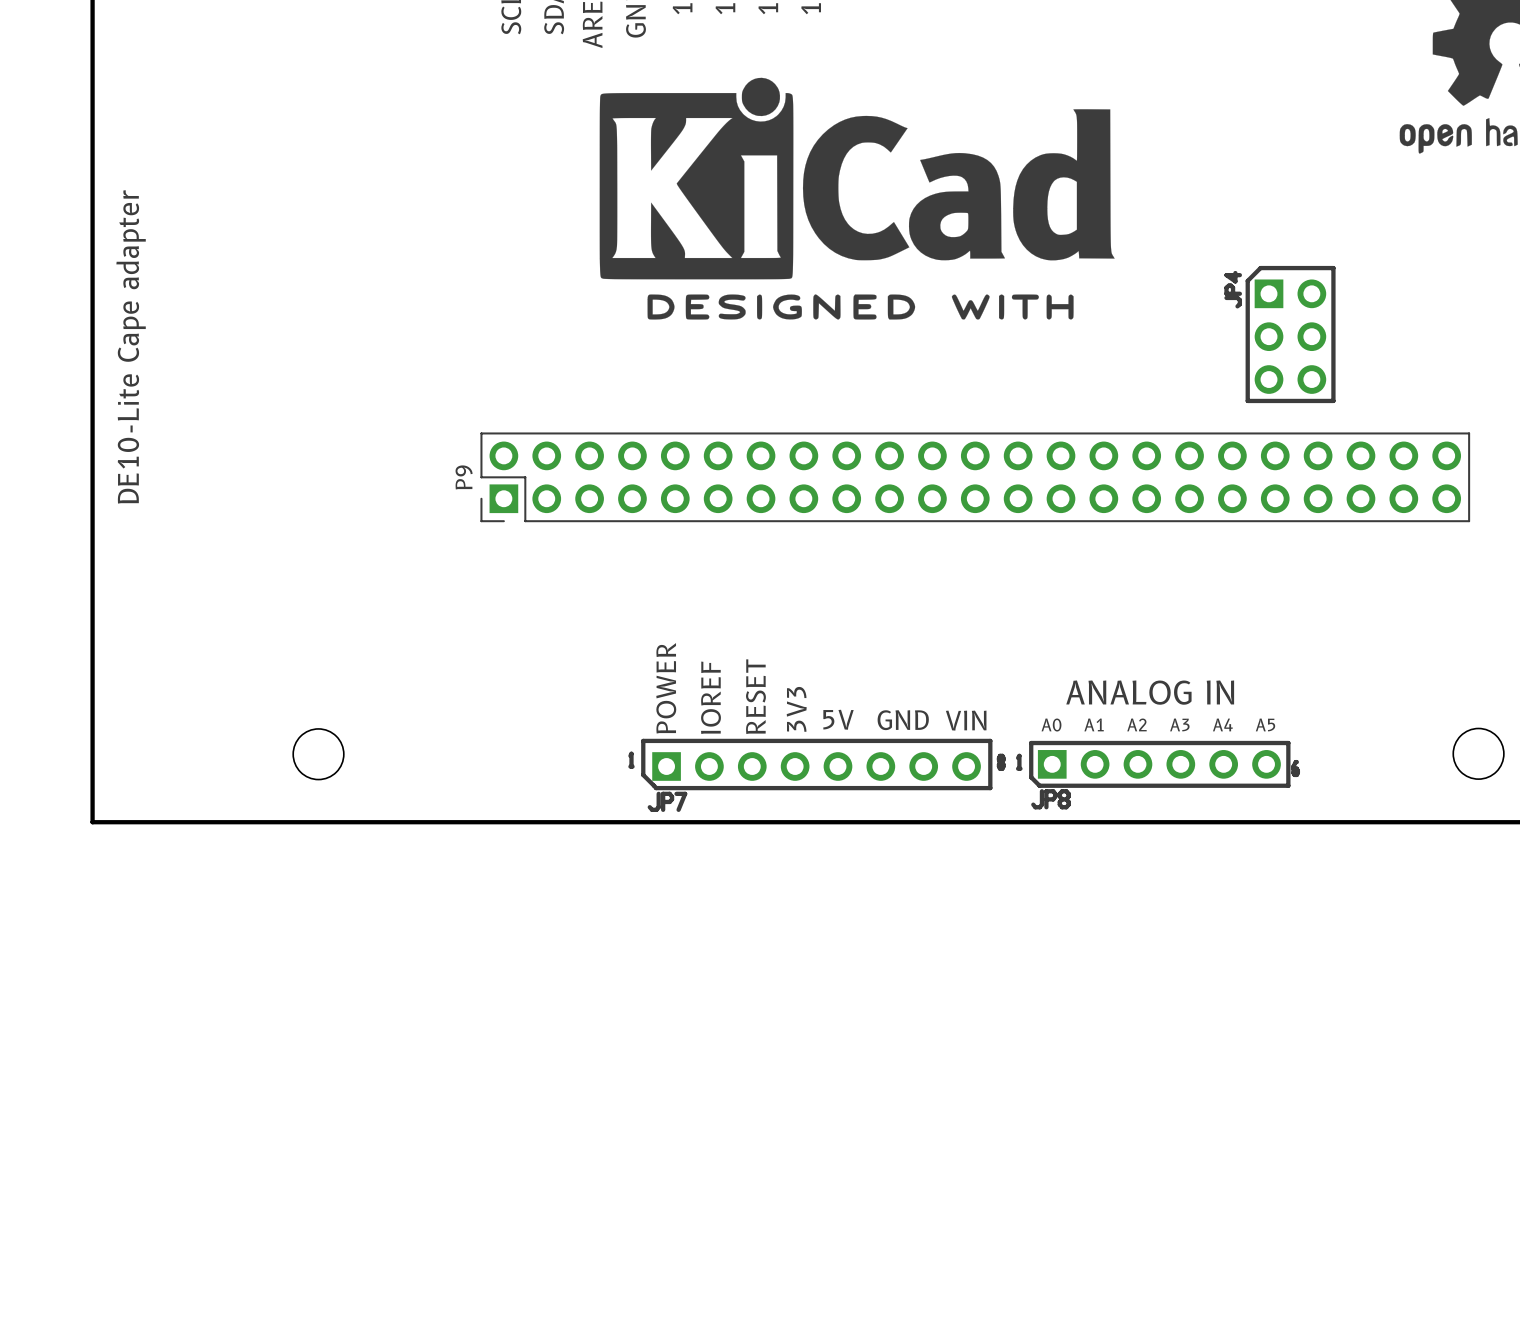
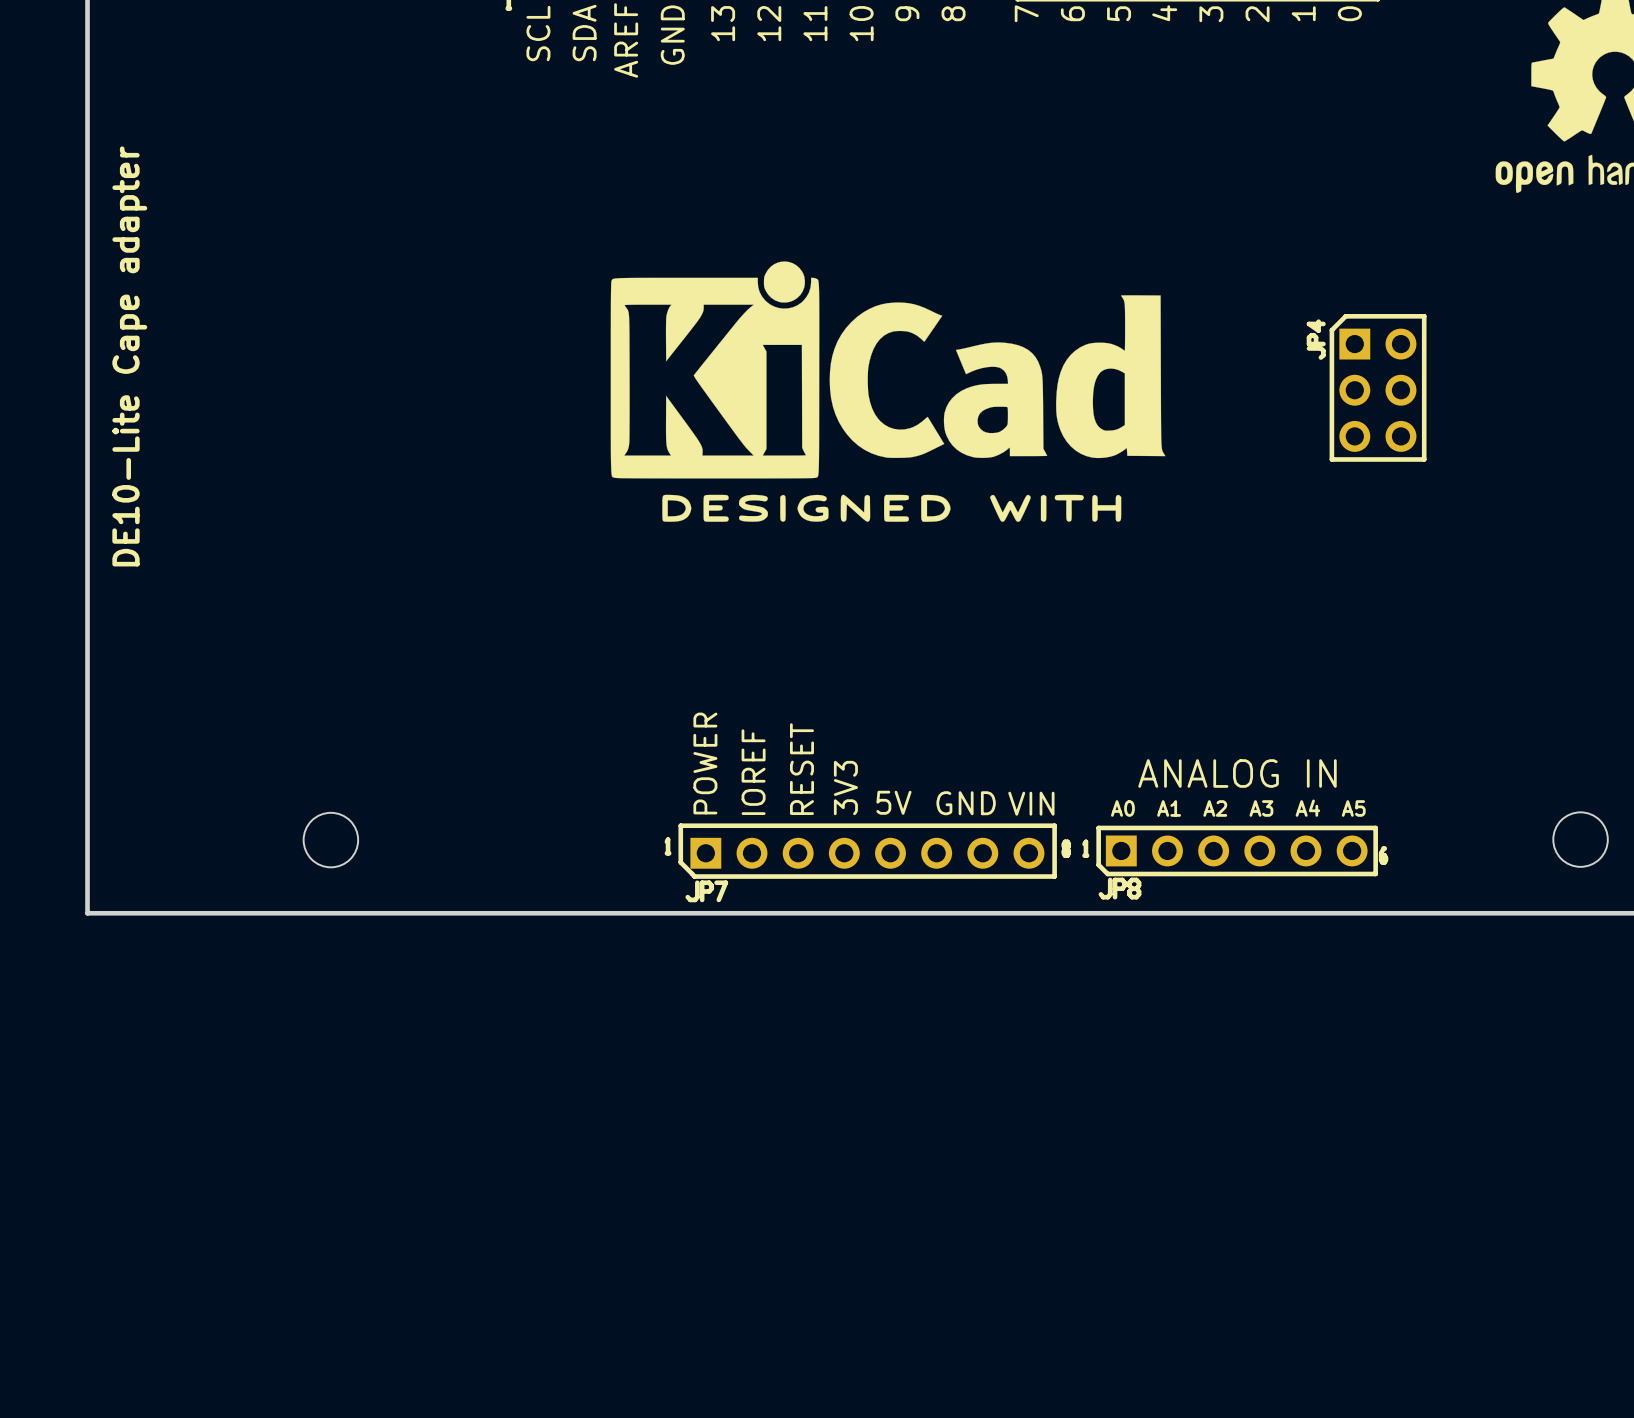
drawing position: (857, 198) -> (888, 391)
P9: (975, 477) -> none

